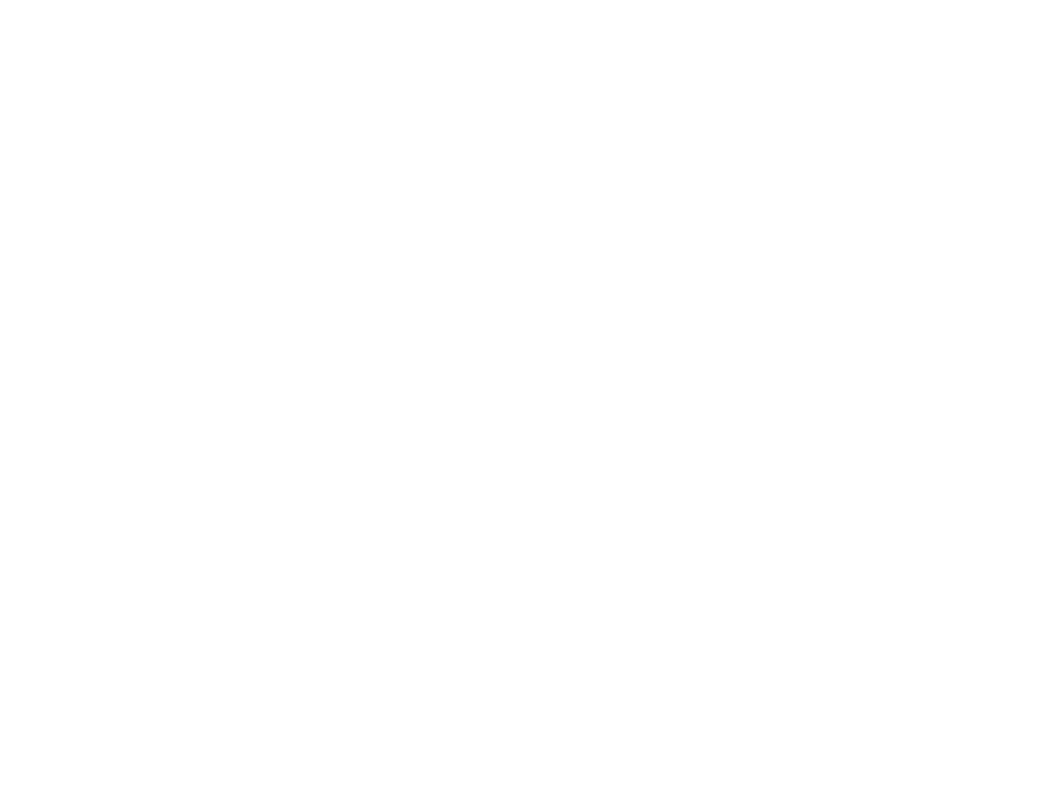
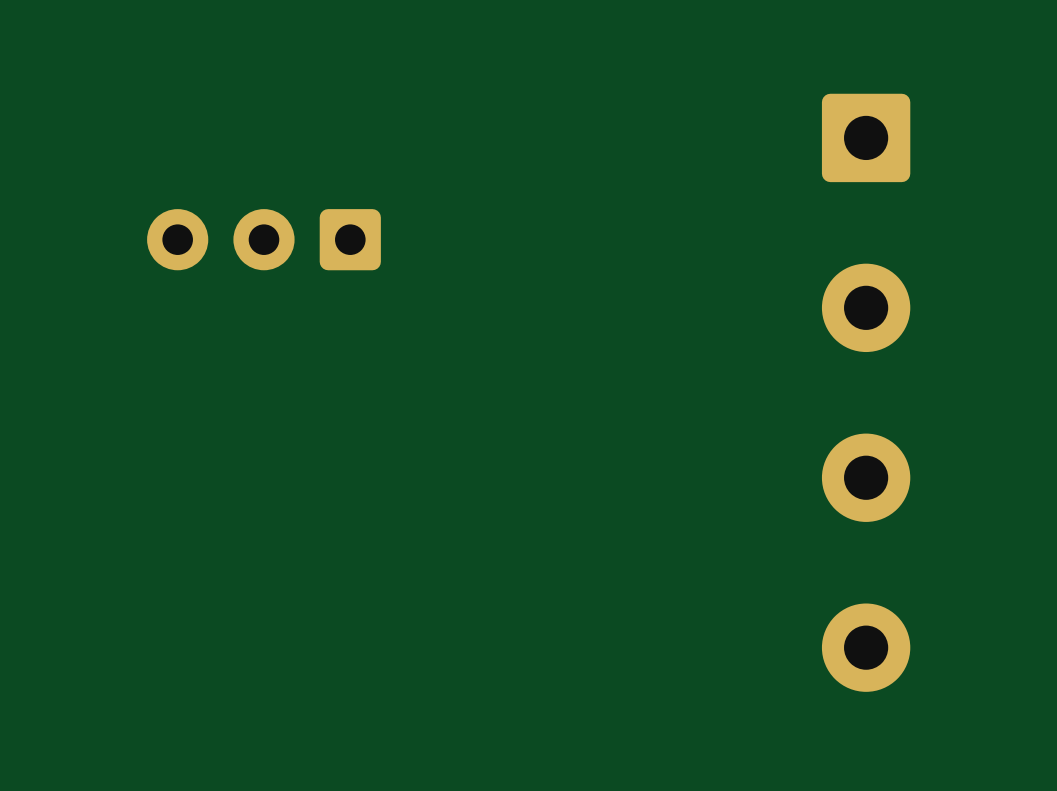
part: none -> (263, 239)
part: none -> (866, 392)

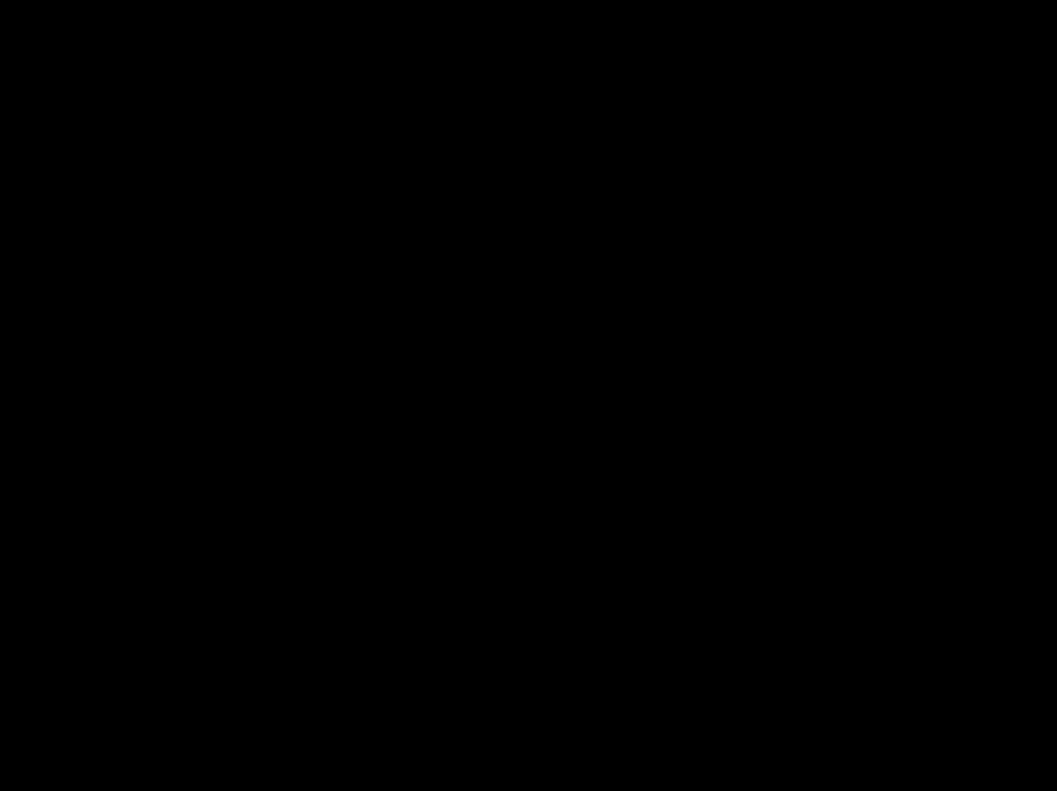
part: (263, 239) -> none
part: (866, 392) -> none

